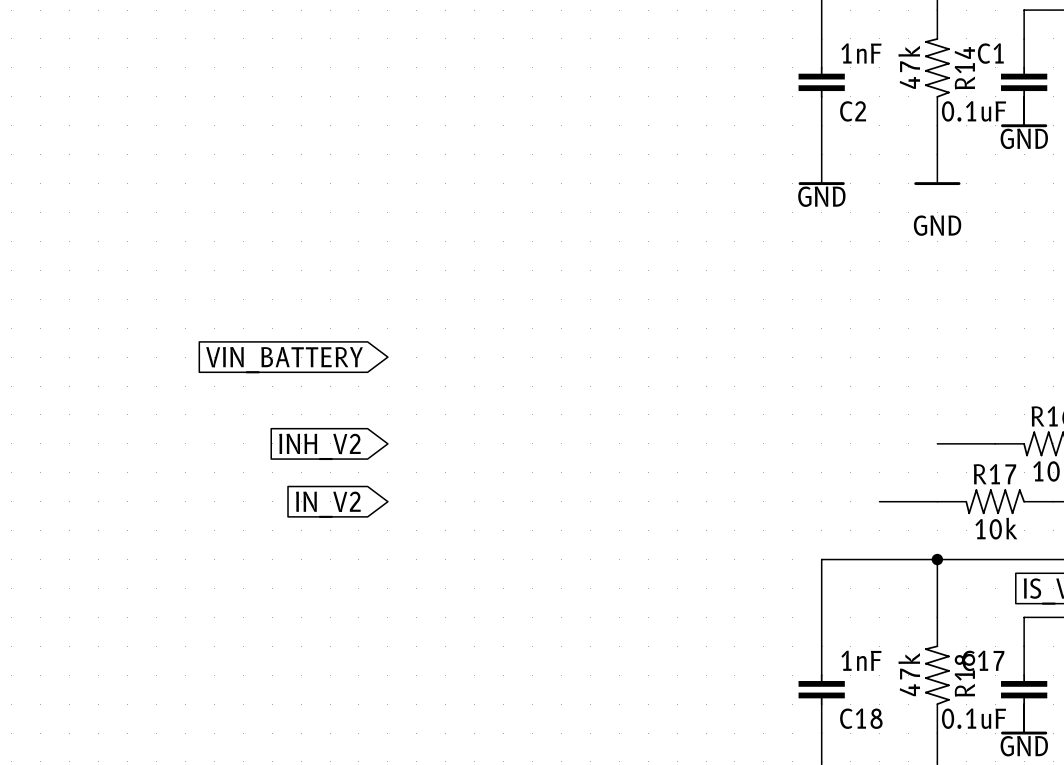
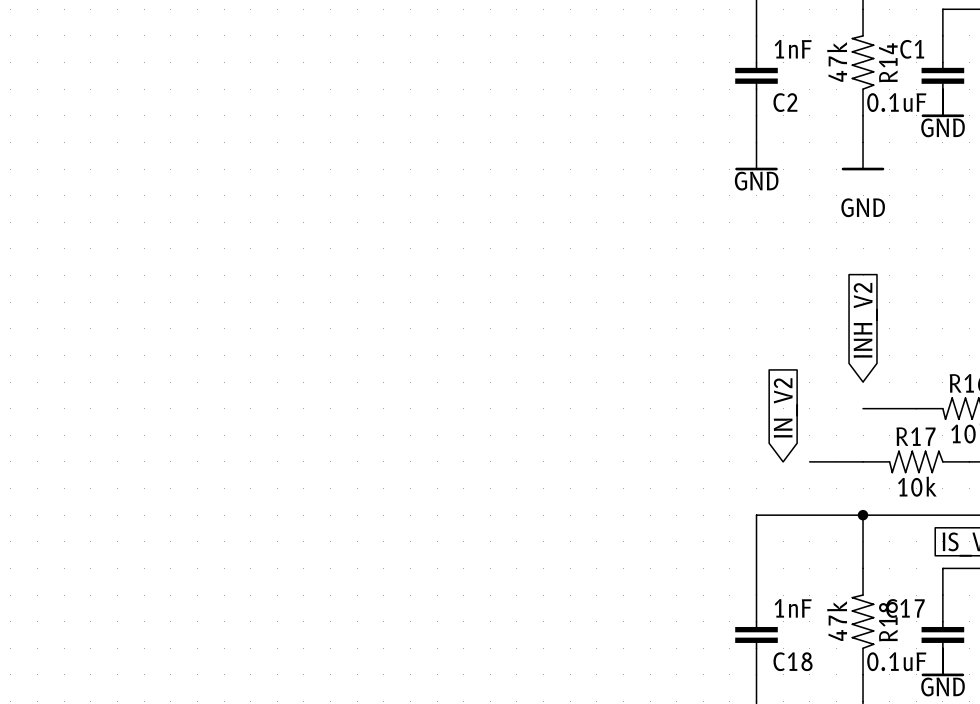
global label: none -> INH_V2 (865, 320)
global label: VIN_BATTERY (284, 360) -> none
global label: none -> IN_V2 (785, 408)
global label: INH_V2 (319, 446) -> none
global label: IN_V2 (328, 504) -> none

